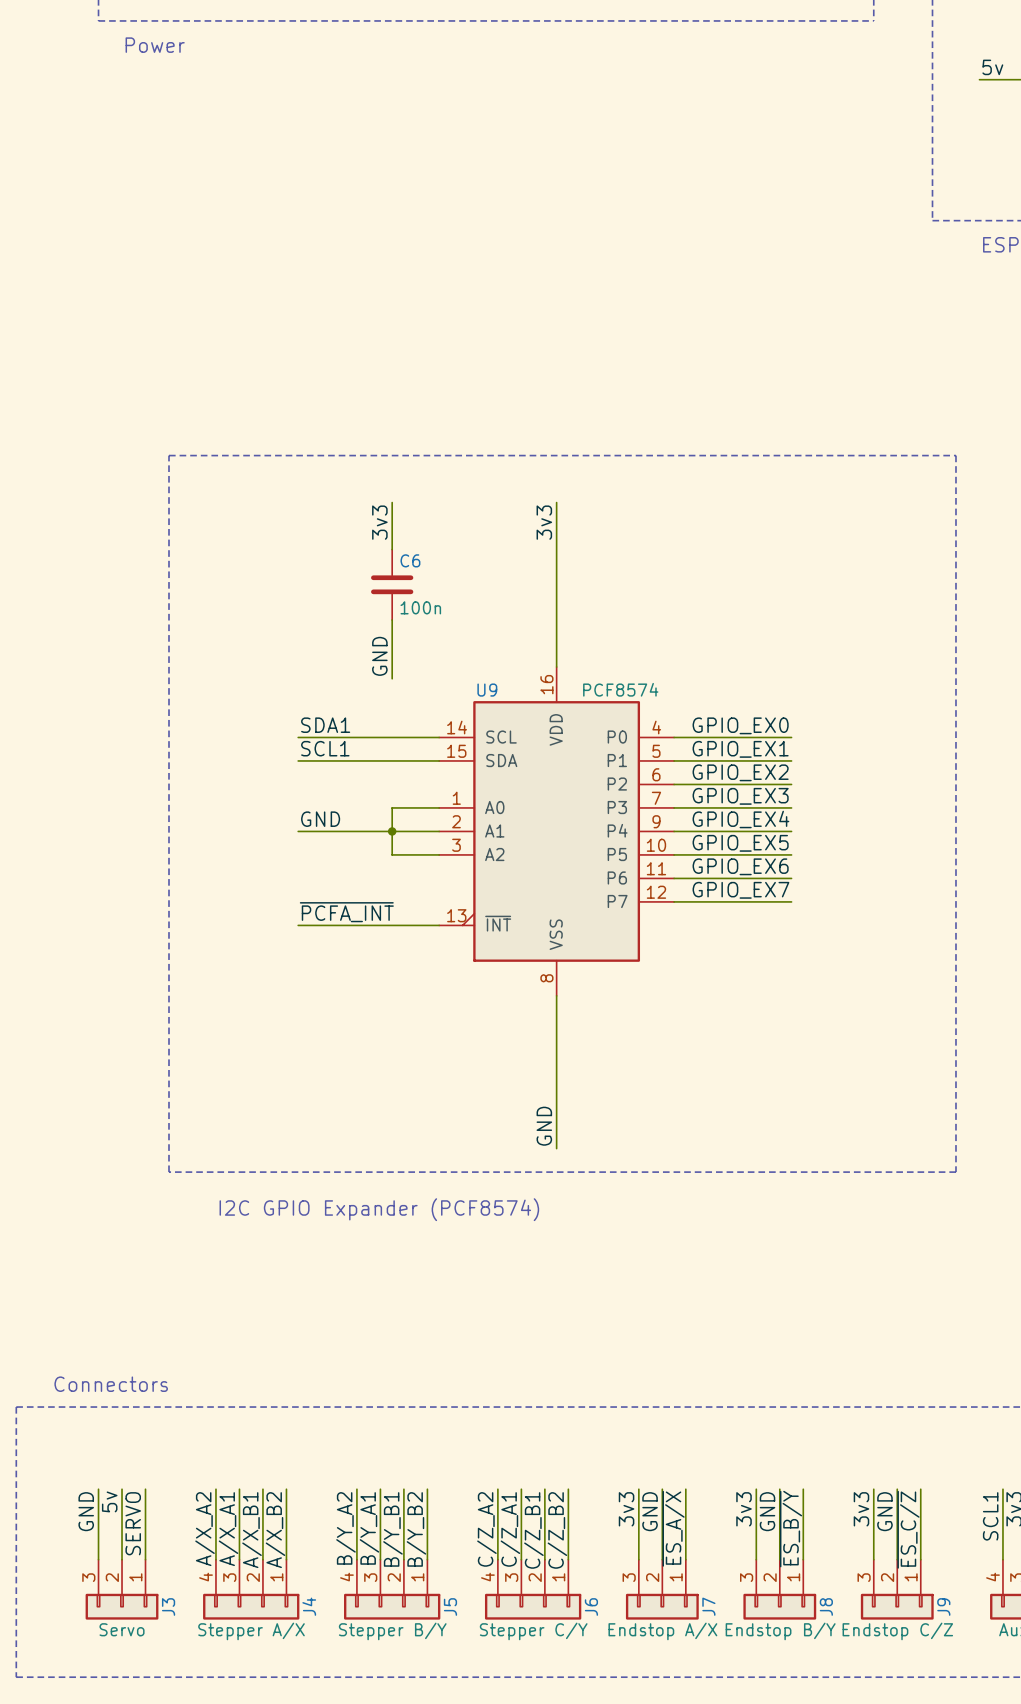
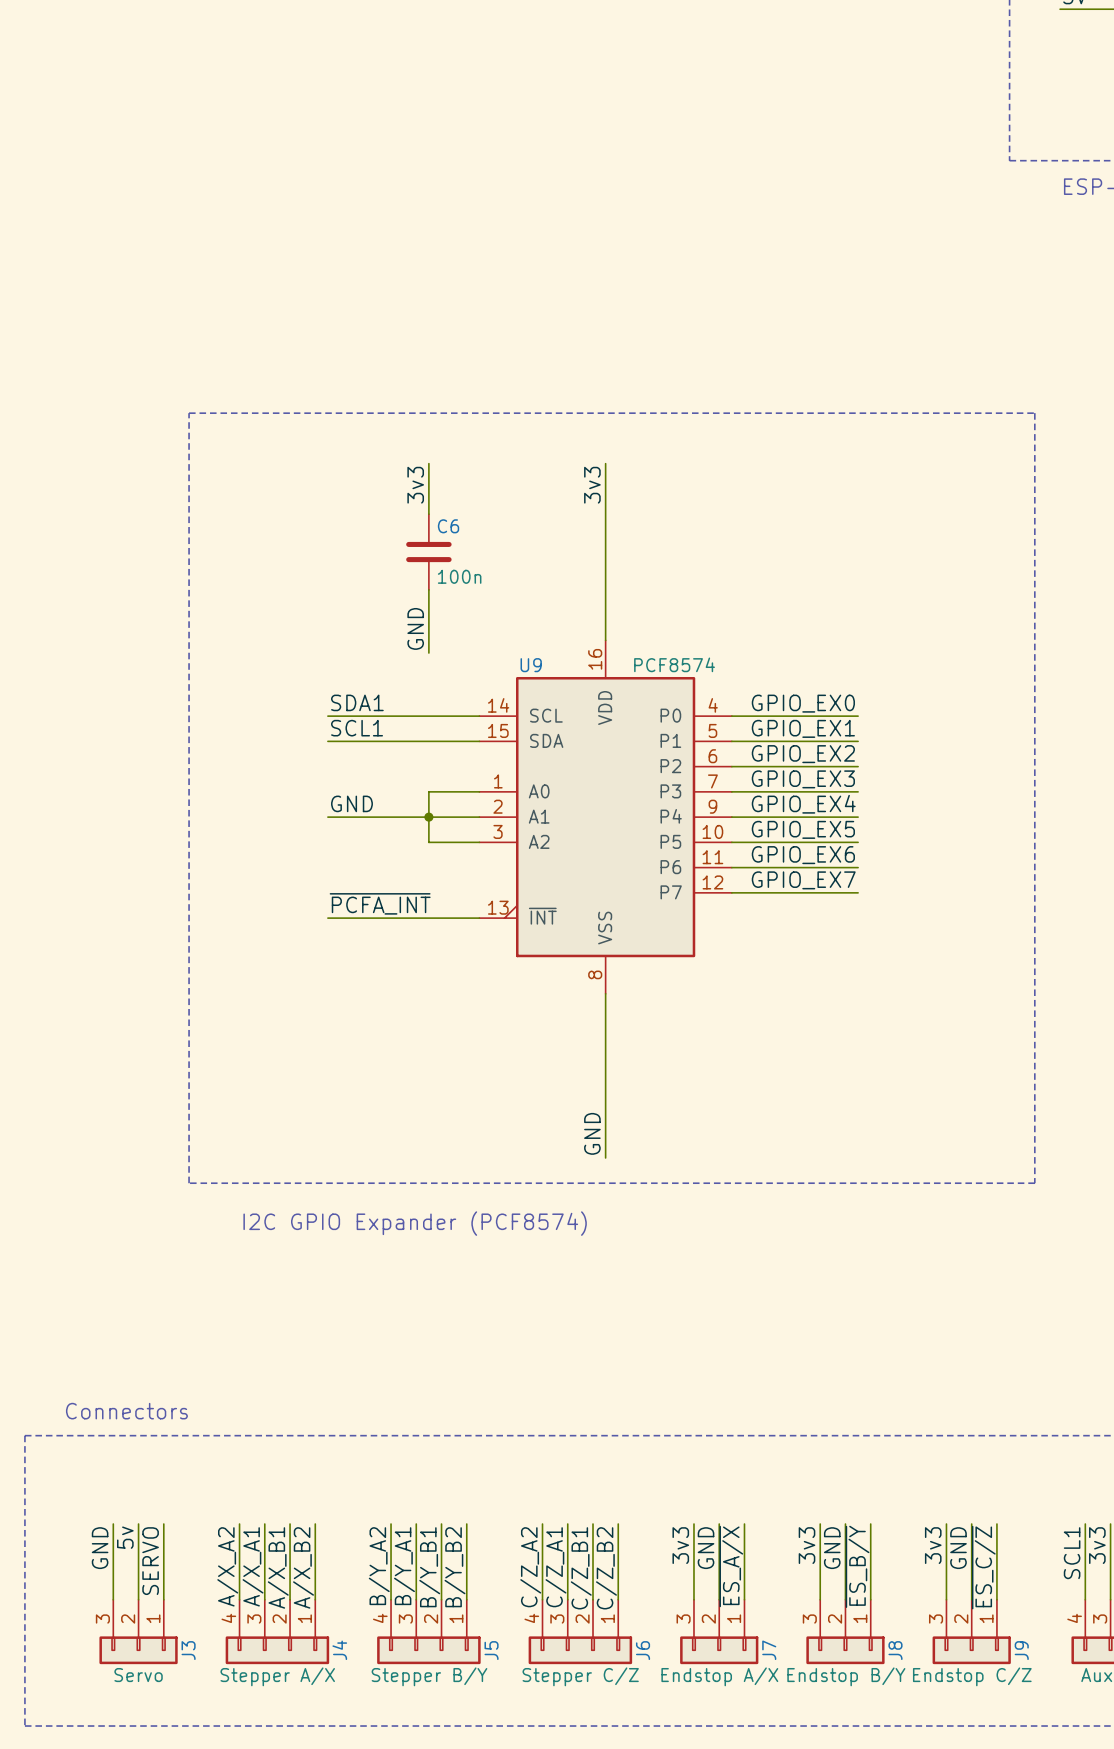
J6 value: Stepper C/Y (533, 1631) -> Stepper C/Z (580, 1676)

